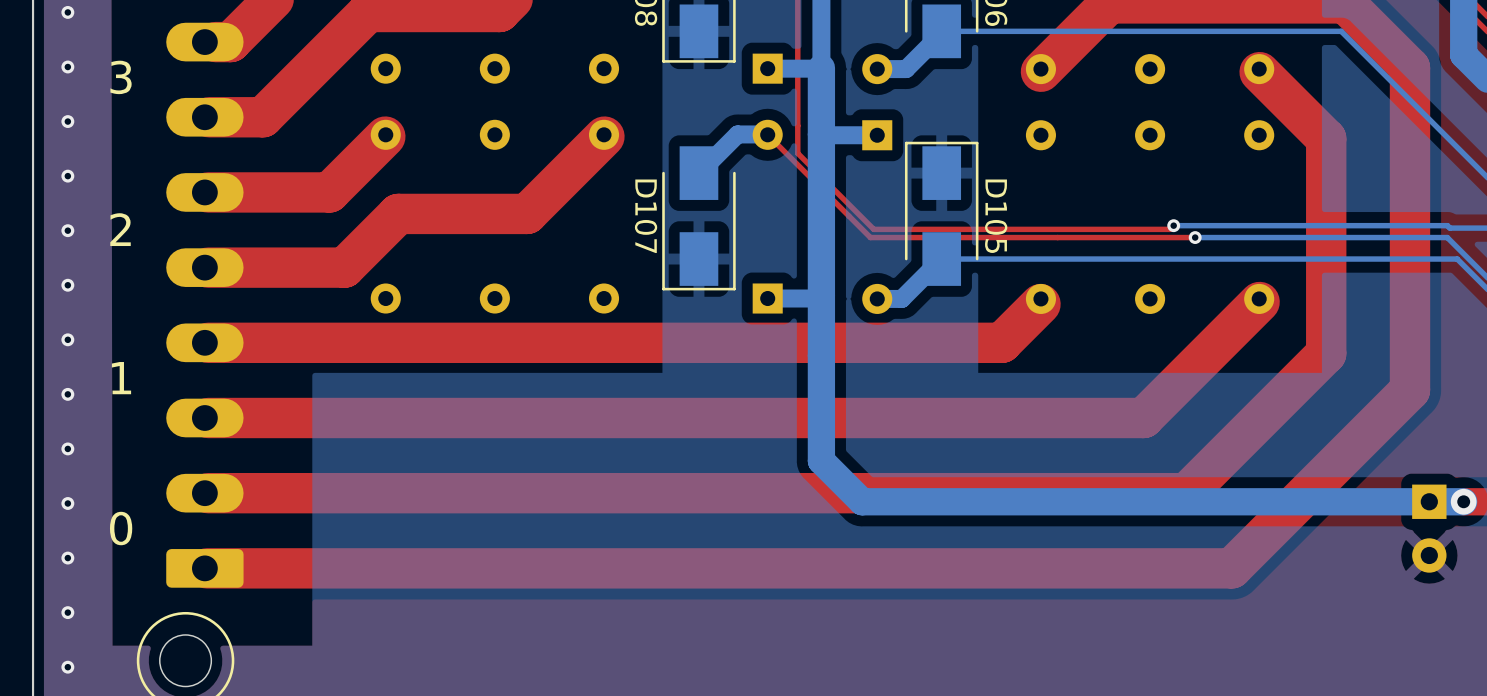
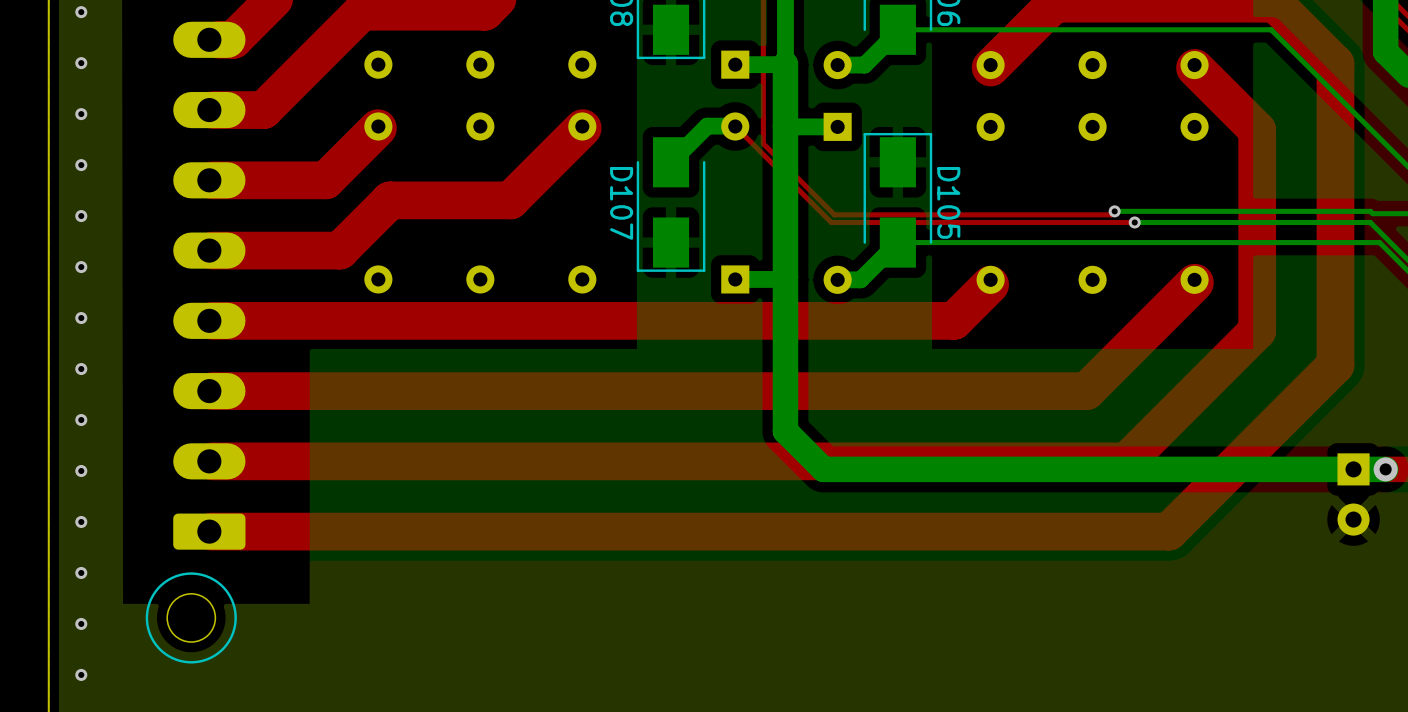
text: 3 (121, 77) -> none
text: 2 (120, 229) -> none
text: 1 (121, 378) -> none
text: 0 (121, 528) -> none

